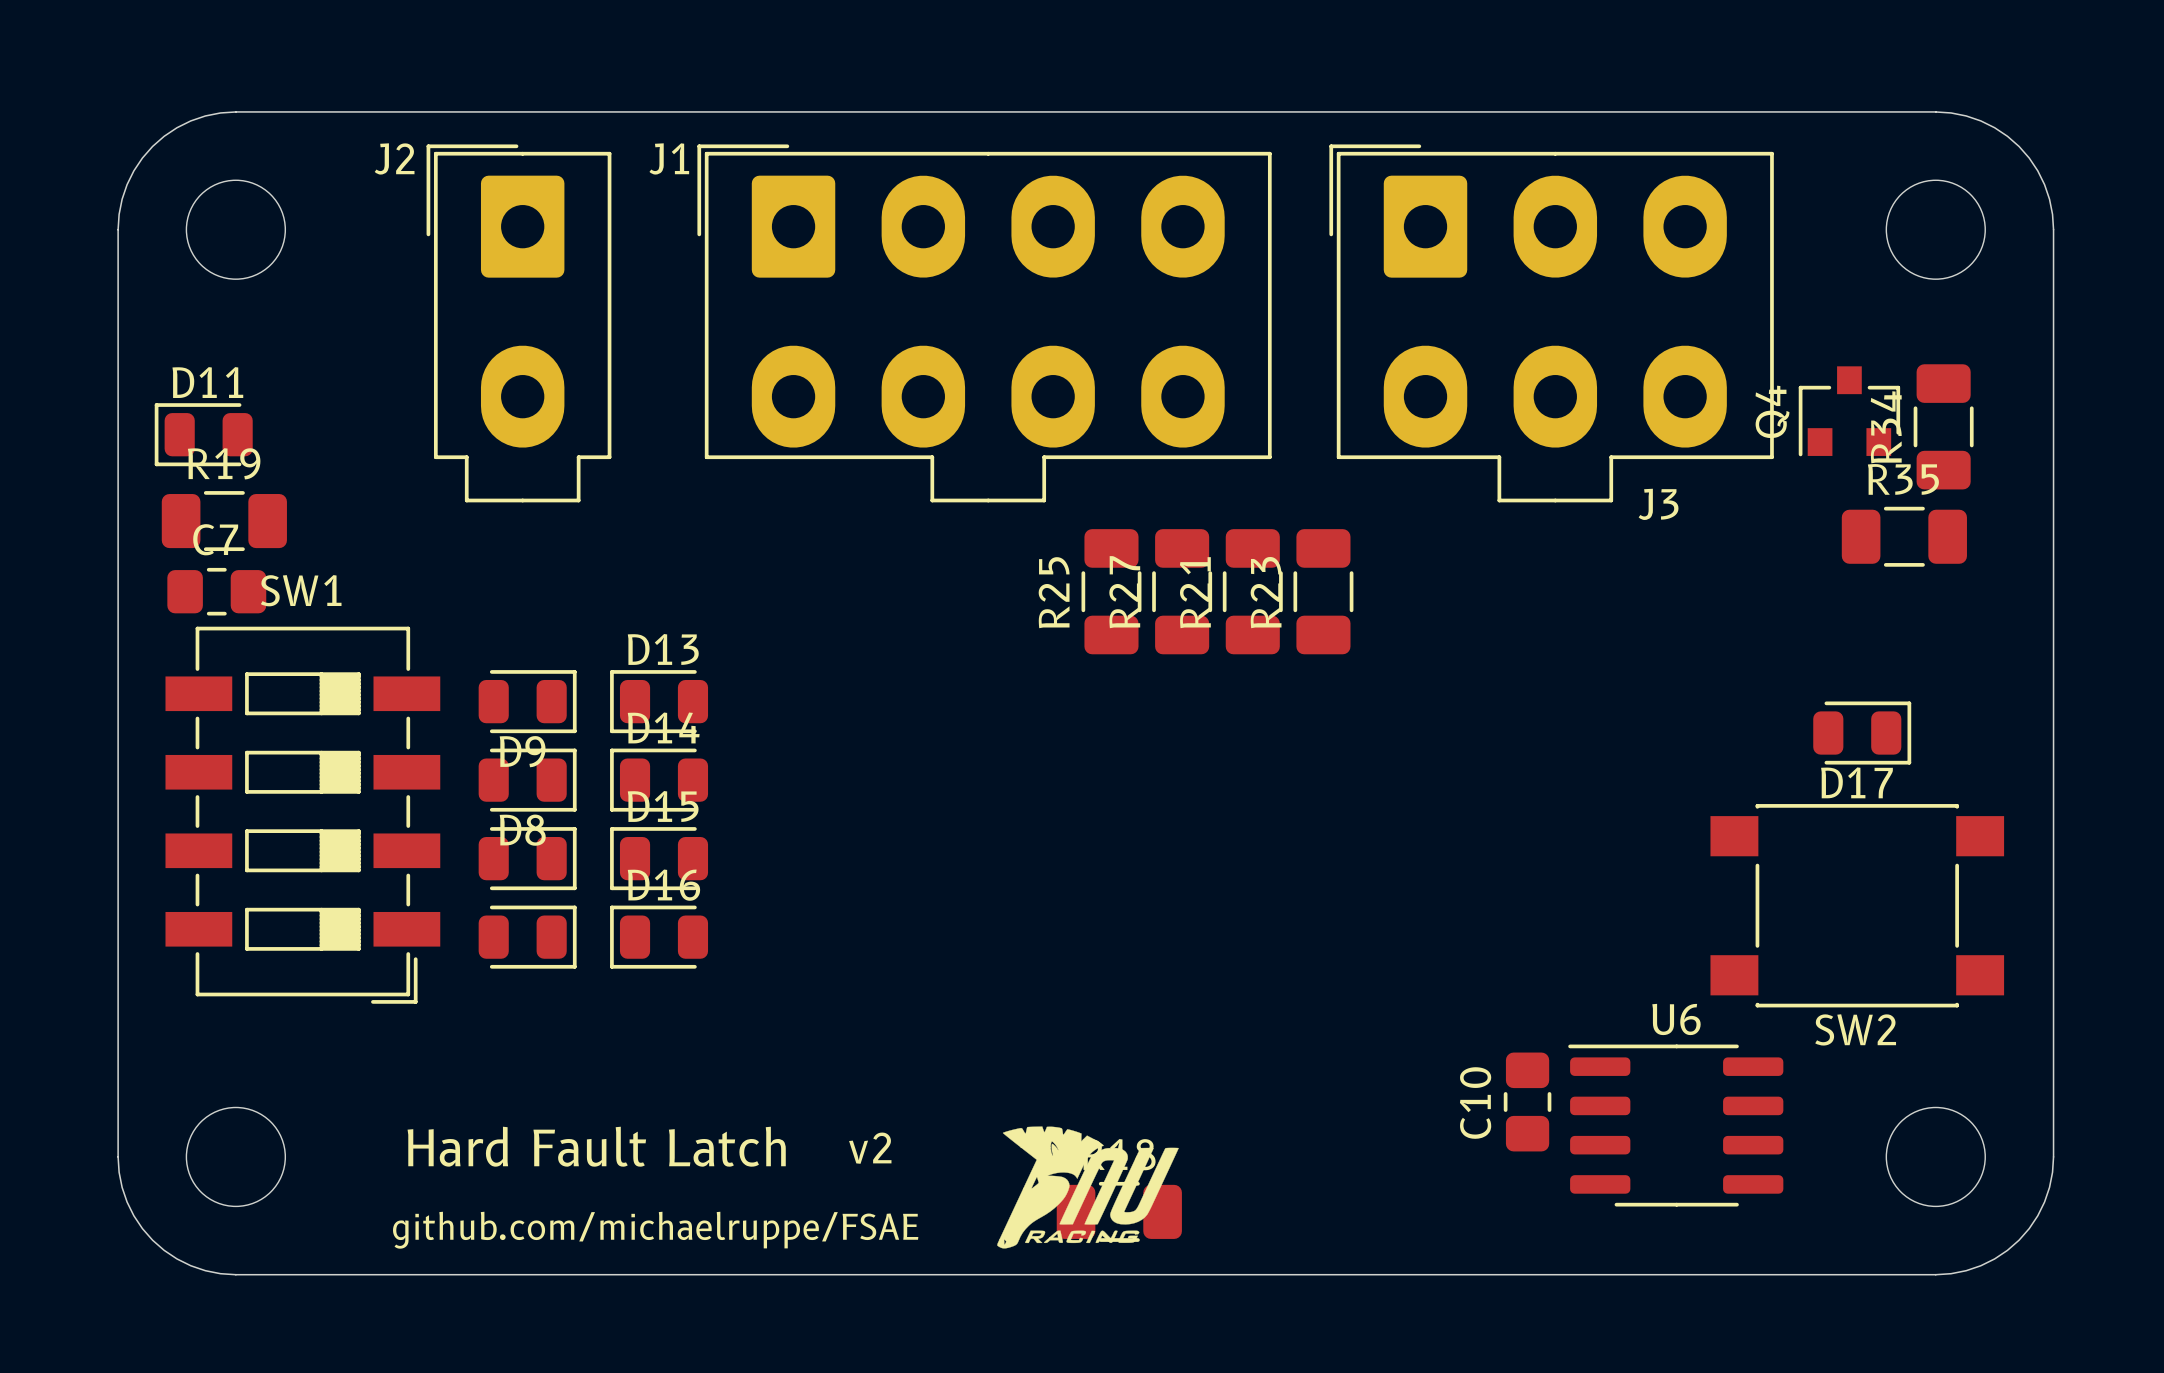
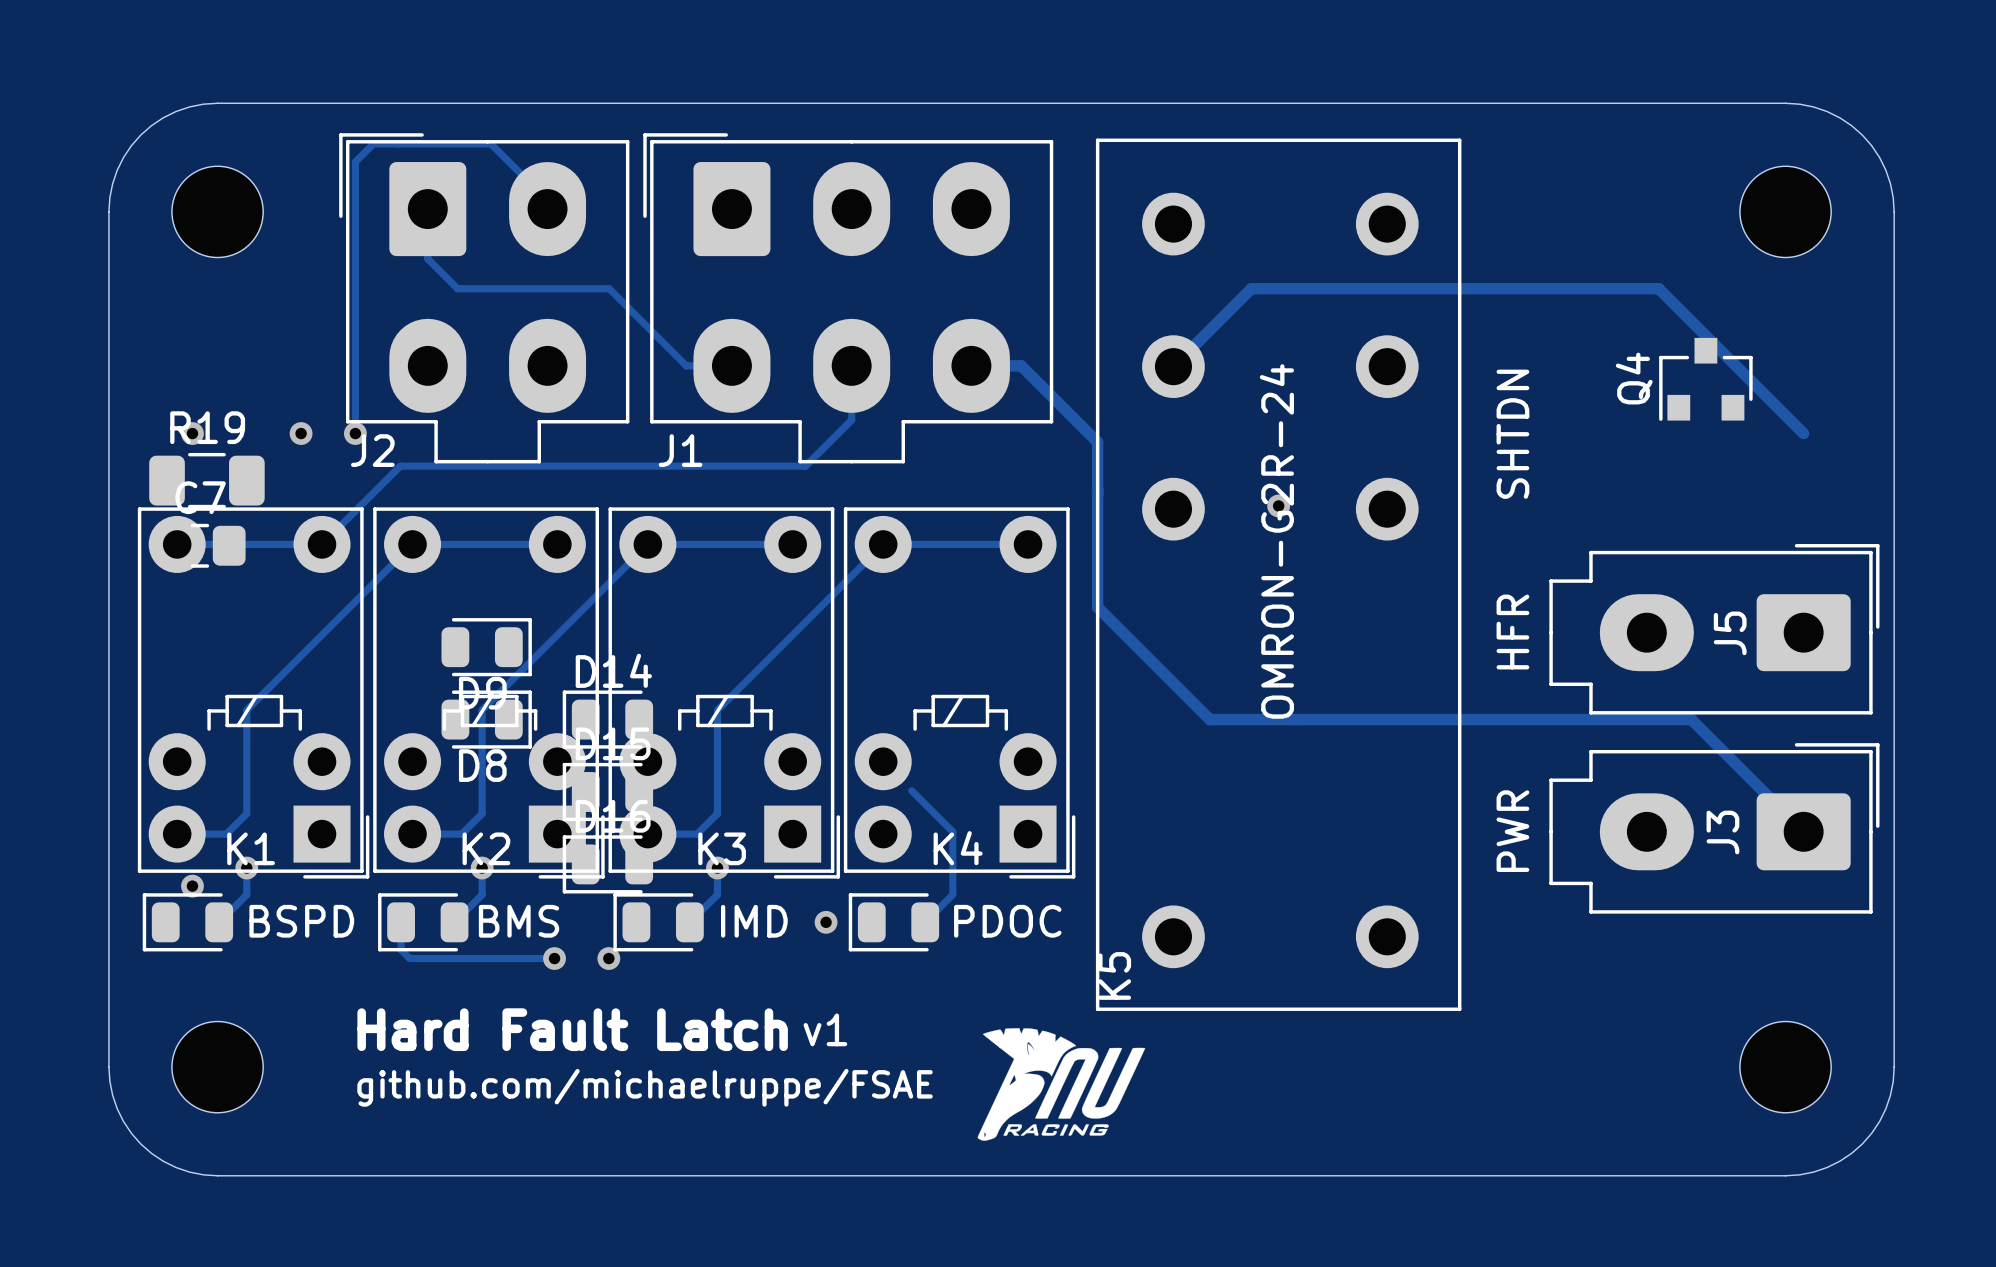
J2 footprint: [426, 144, 612, 503] -> [339, 133, 630, 464]
J1 footprint: [697, 144, 1272, 503] -> [643, 133, 1054, 464]
J3 footprint: [1329, 144, 1774, 503] -> [1549, 743, 1880, 914]
J2 name position: J2 (394, 158) -> J2 (372, 450)
J1 name position: J1 (669, 158) -> J1 (680, 450)
track: none -> (427, 209) (427, 258) (457, 288) (609, 288) (686, 365) (731, 365)
track: none -> (547, 209) (547, 200) (490, 143) (373, 143) (355, 162) (355, 433)
track: none -> (851, 365) (851, 420) (805, 466) (400, 466) (322, 544) (177, 544)
track: none -> (971, 365) (1021, 365) (1097, 442) (1097, 607) (1209, 719) (1691, 719) (1803, 831)
track: none -> (1173, 366) (1251, 288) (1658, 288) (1803, 433)
R34: (1943, 426) -> none
D11: (203, 434) -> none
via: none -> (192, 433)
via: none -> (301, 433)
via: none -> (355, 433)
text: none -> SHTDN (1512, 434)
J3 name position: J3 (1658, 504) -> J3 (1722, 832)
R35: (1904, 536) -> none
via: none -> (1278, 505)
track: none -> (557, 544) (412, 544) (246, 710) (246, 813) (226, 834) (177, 834)
track: none -> (792, 544) (647, 544) (482, 710) (482, 813) (461, 834) (412, 834)
track: none -> (1028, 544) (883, 544) (717, 710) (717, 813) (697, 834) (647, 834)
R25: (1111, 591) -> none
R27: (1182, 591) -> none
R21: (1252, 591) -> none
R23: (1323, 591) -> none
K5: none -> OMRON-G2R-24 (1278, 574)
J5: none -> (1714, 629)
text: none -> HFR (1512, 632)
D13: (659, 701) -> none
D17: (1862, 733) -> none
K1: none -> (253, 692)
K2: none -> (488, 692)
K3: none -> (724, 692)
K4: none -> (959, 692)
SW1: (302, 815) -> none
track: none -> (911, 790) (952, 831) (952, 894) (925, 922)
part: (527, 858) -> none
text: none -> PWR (1512, 831)
SW2: (1857, 905) -> none
part: (527, 937) -> none
track: none -> (246, 868) (246, 894) (219, 922)
via: none -> (246, 868)
track: none -> (482, 868) (482, 894) (454, 922)
via: none -> (482, 868)
track: none -> (717, 868) (717, 894) (689, 922)
via: none -> (717, 868)
via: none -> (192, 886)
text: none -> BSPD (301, 921)
text: none -> BMS (519, 921)
text: none -> IMD (754, 921)
text: none -> PDOC (1007, 921)
part: none -> (187, 922)
track: none -> (401, 922) (401, 949) (409, 958) (554, 958)
part: none -> (423, 922)
part: none -> (658, 922)
via: none -> (826, 922)
part: none -> (893, 922)
via: none -> (554, 958)
via: none -> (608, 958)
C10: (1527, 1101) -> none
text: none -> v1 (825, 1029)
U6: (1675, 1125) -> none
text position: Hard Fault Latch (596, 1146) -> Hard Fault Latch (572, 1029)
text: v2 (870, 1148) -> none
drawing position: (1087, 1187) -> (1061, 1084)
part: (1119, 1211) -> none
text position: github.com/michaelruppe/FSAE (655, 1230) -> github.com/michaelruppe/FSAE (645, 1087)

